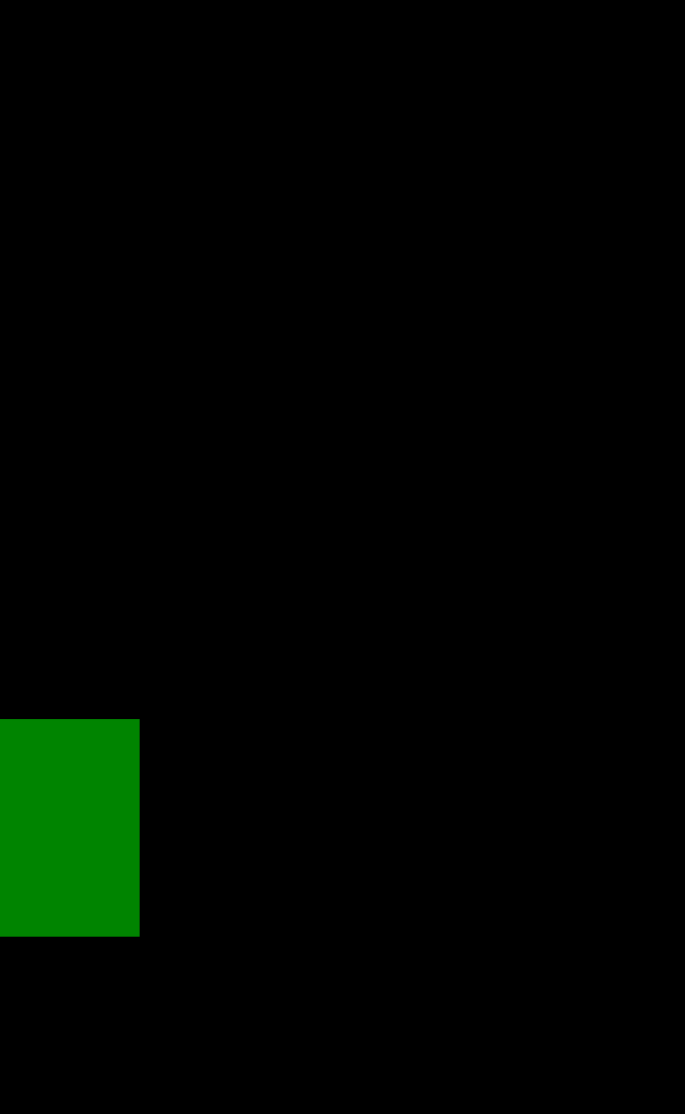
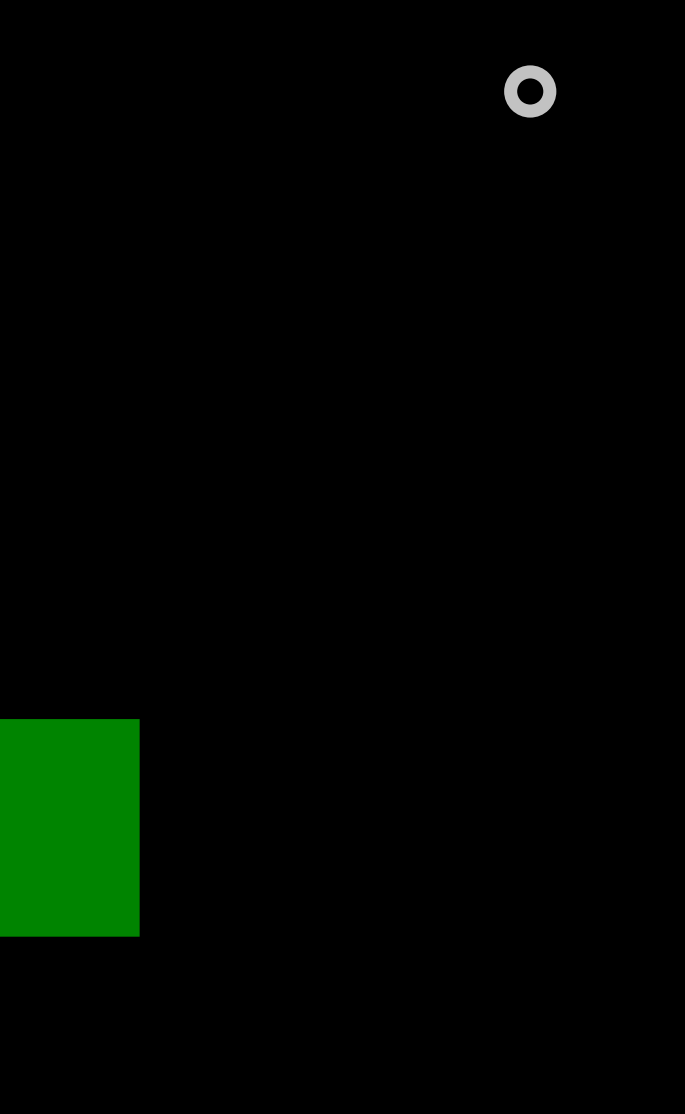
via: none -> (530, 91)

